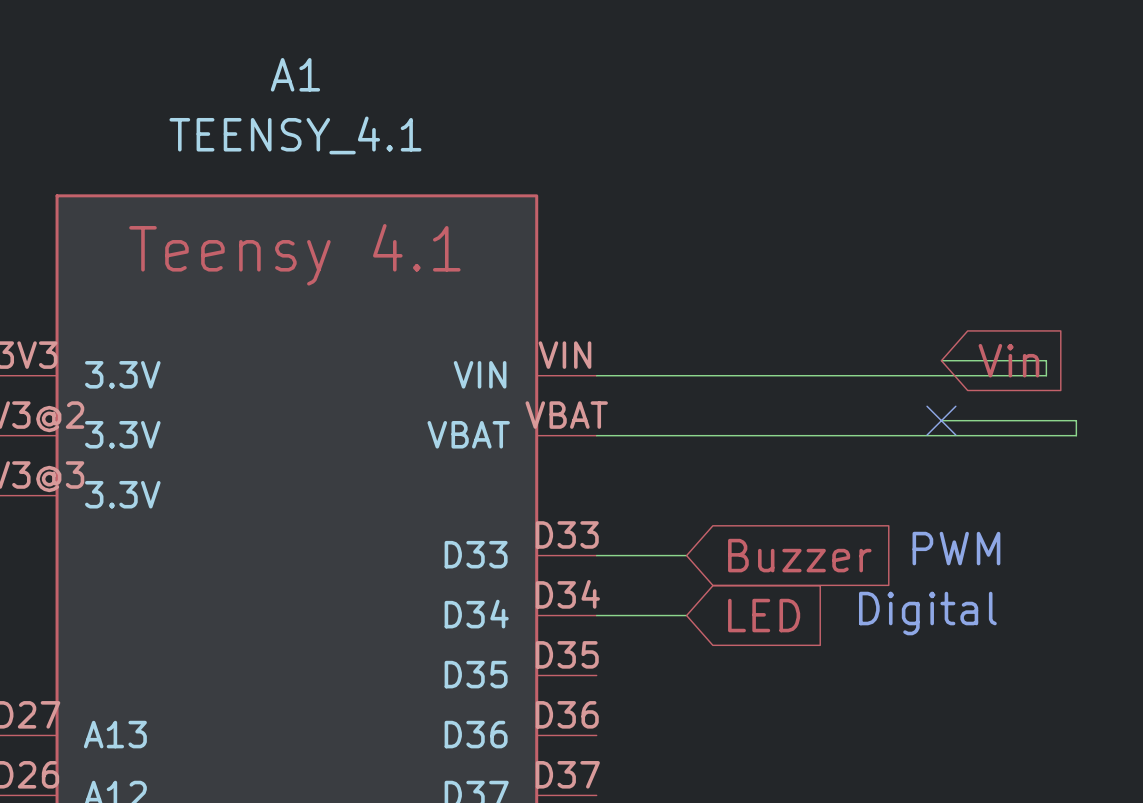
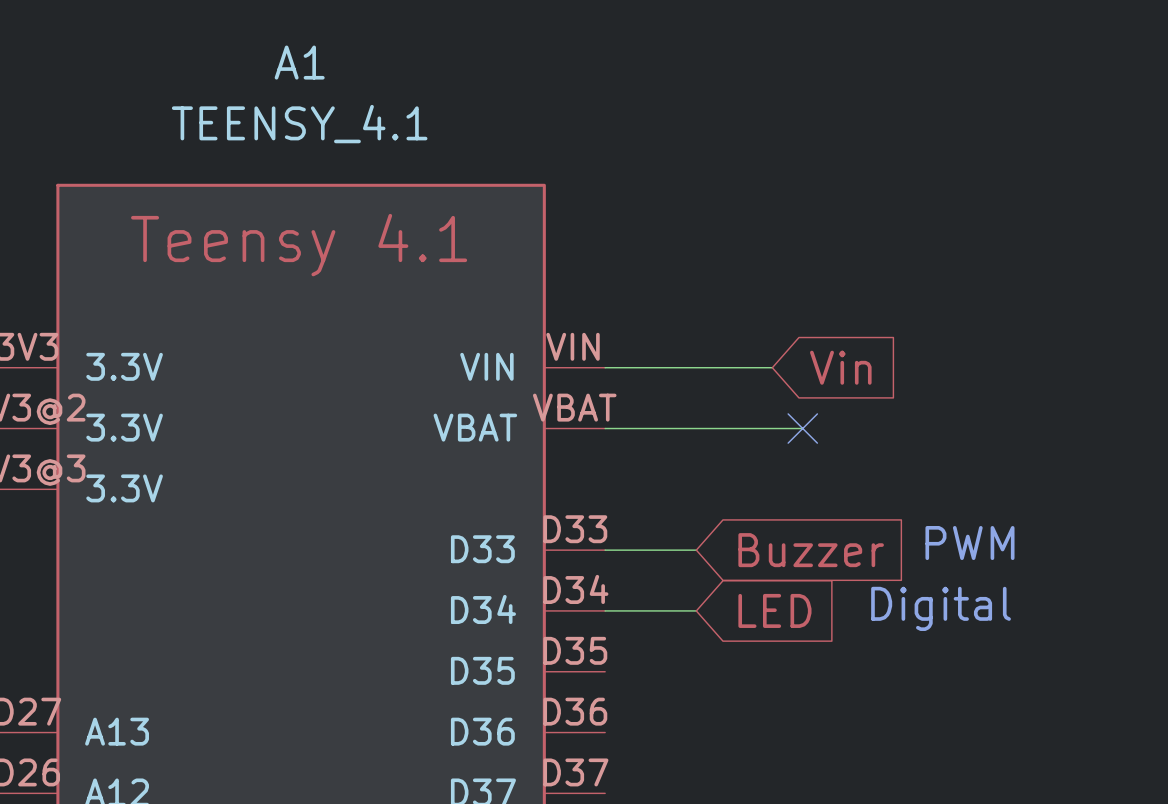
wire: (941, 360) (1046, 360) (1046, 375) (761, 375) -> none
global label position: Vin (1008, 360) -> Vin (840, 367)
wire: (941, 420) (1076, 420) (1076, 435) (791, 435) -> none
no-connect mark: (941, 420) -> none
no-connect mark: none -> (802, 428)

